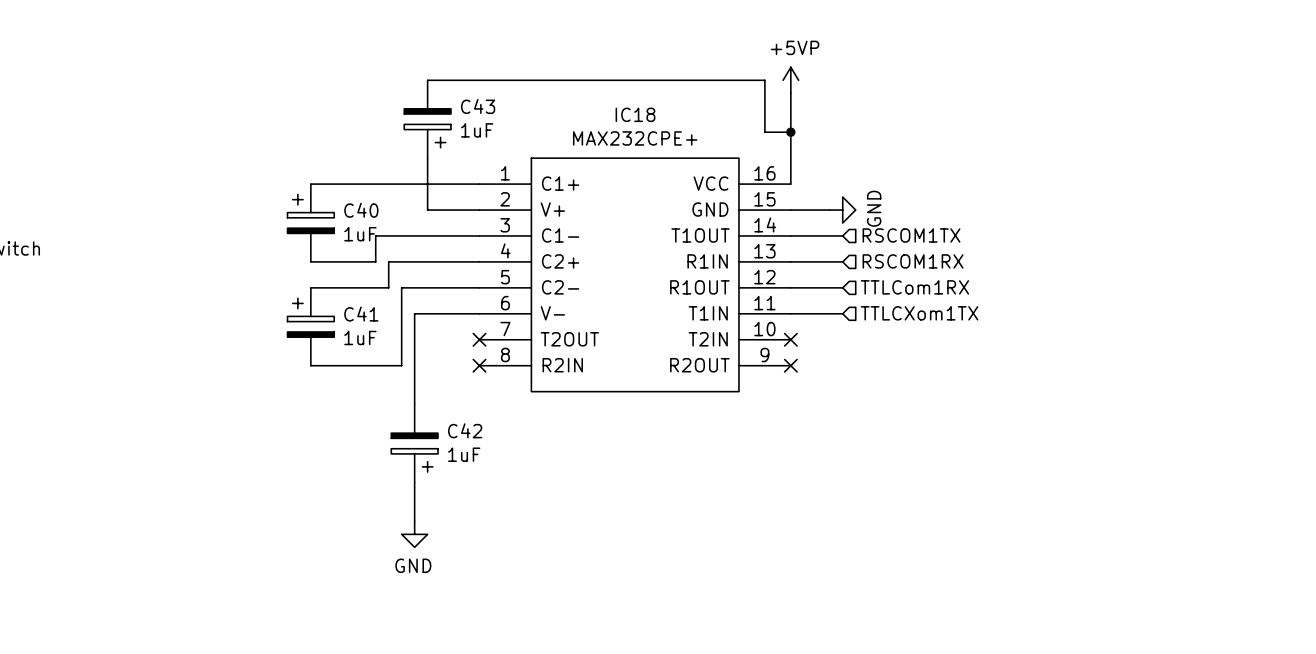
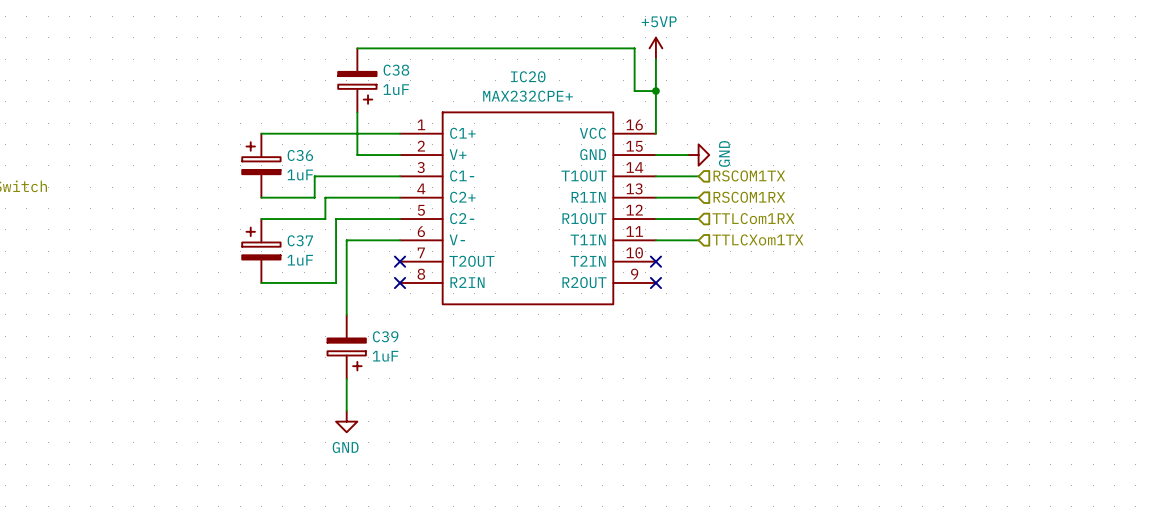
C43 name: C43 (478, 106) -> C38 (396, 70)
IC18 name: IC18 (635, 114) -> IC20 (528, 76)
C40 name: C40 (361, 210) -> C36 (300, 155)
C41 name: C41 (361, 314) -> C37 (300, 240)
C42 name: C42 (465, 430) -> C39 (385, 336)

